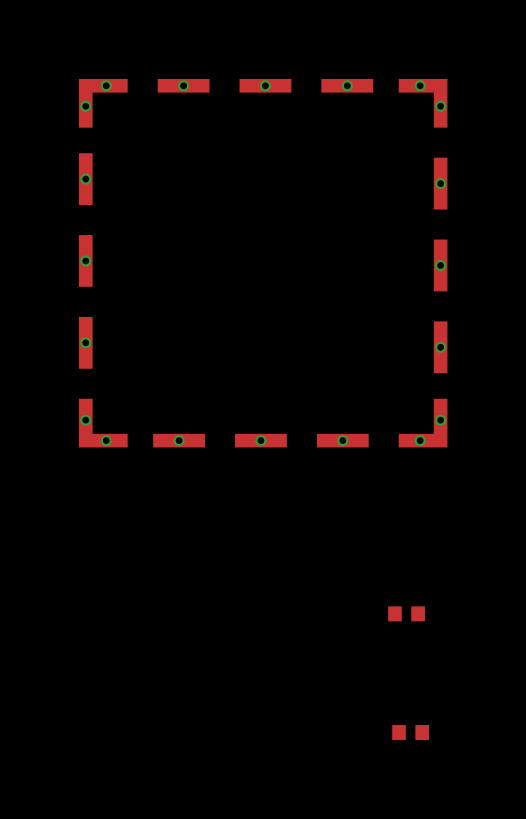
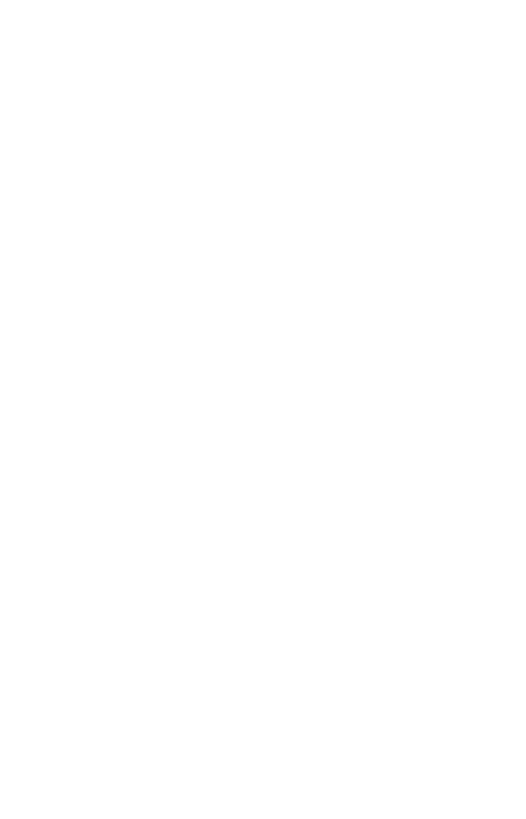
part: (263, 263) -> none
part: (406, 613) -> none
part: (410, 732) -> none

